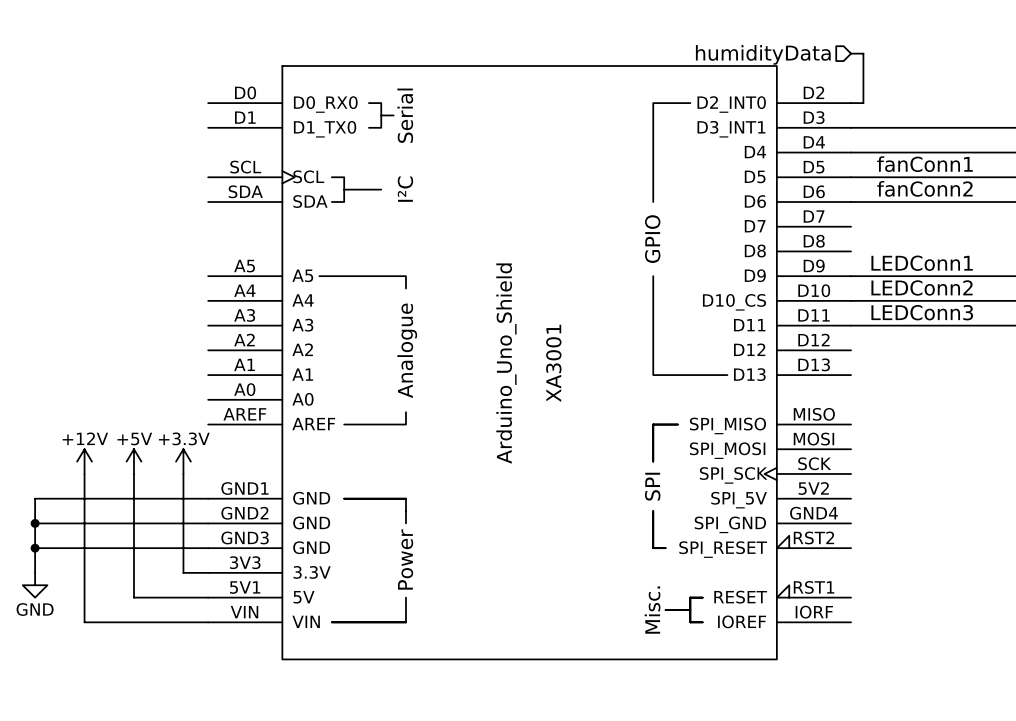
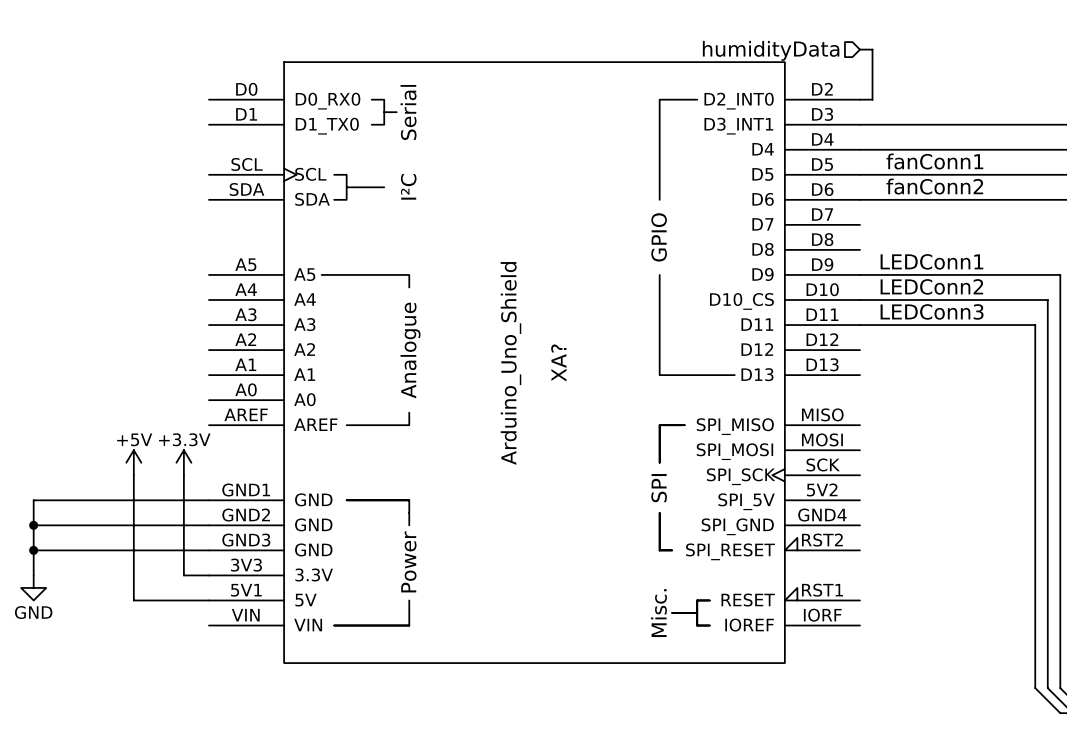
XA3001 name: XA3001 (553, 363) -> XA? (558, 363)
power symbol: +12V (84, 461) -> none
wire: (84, 473) (84, 622) (208, 622) -> none

